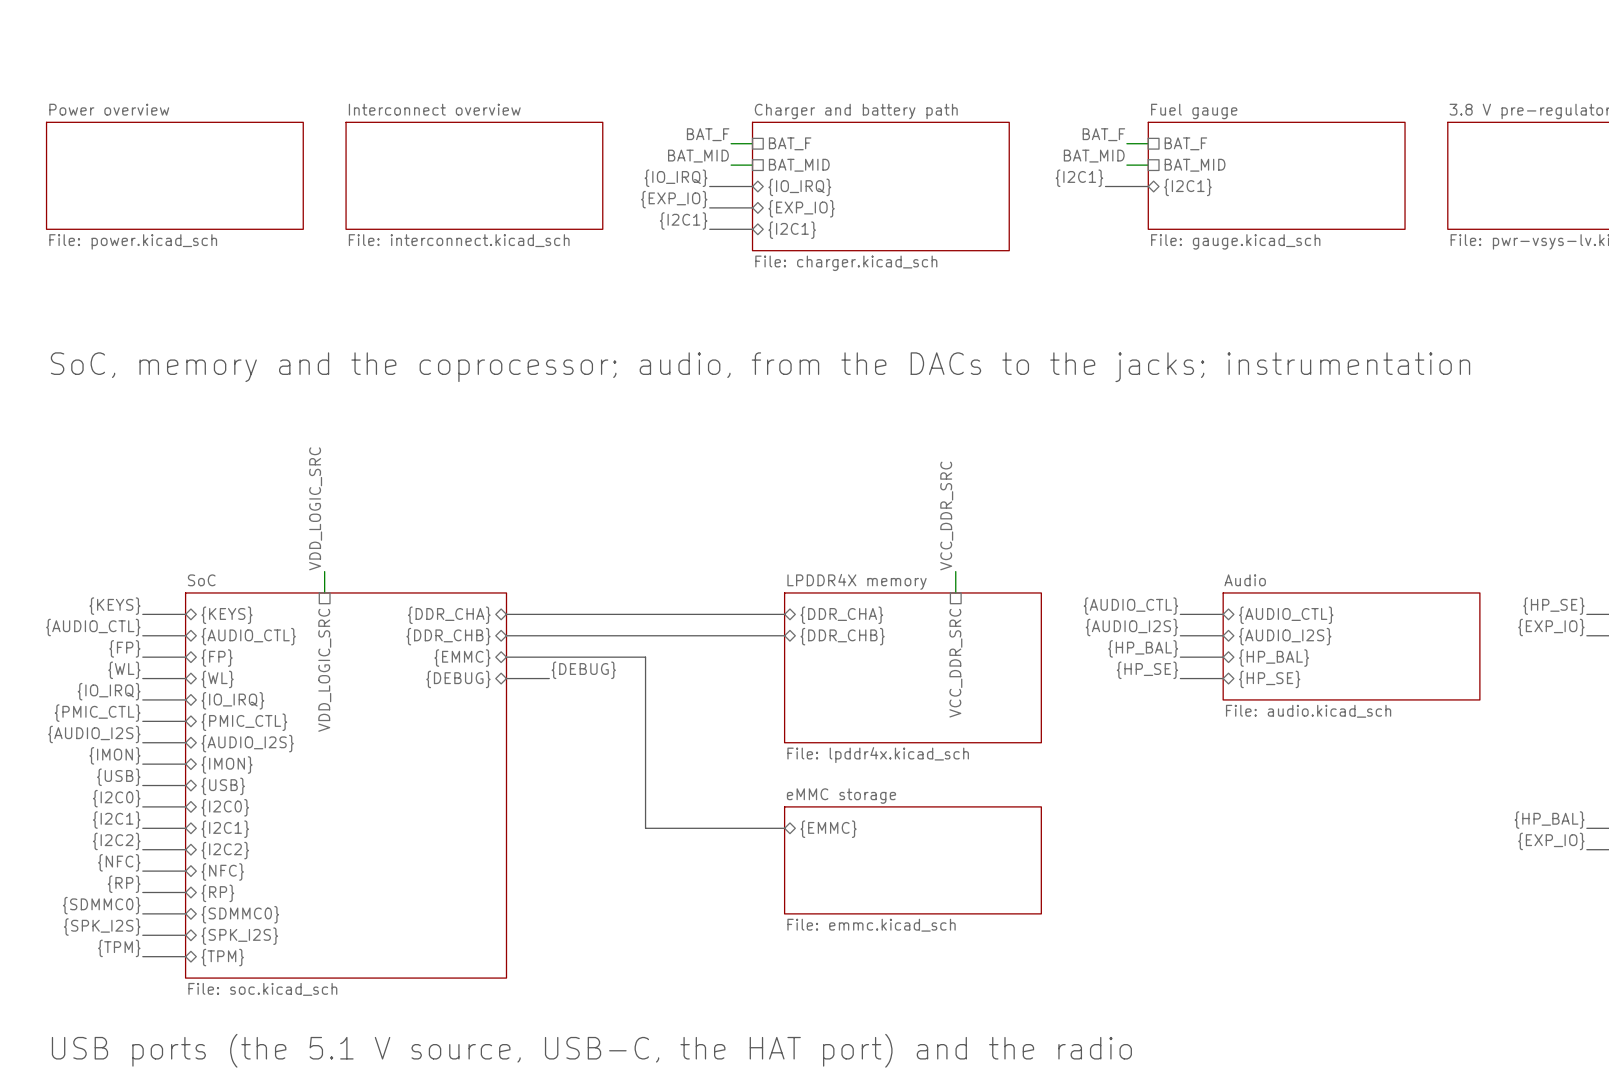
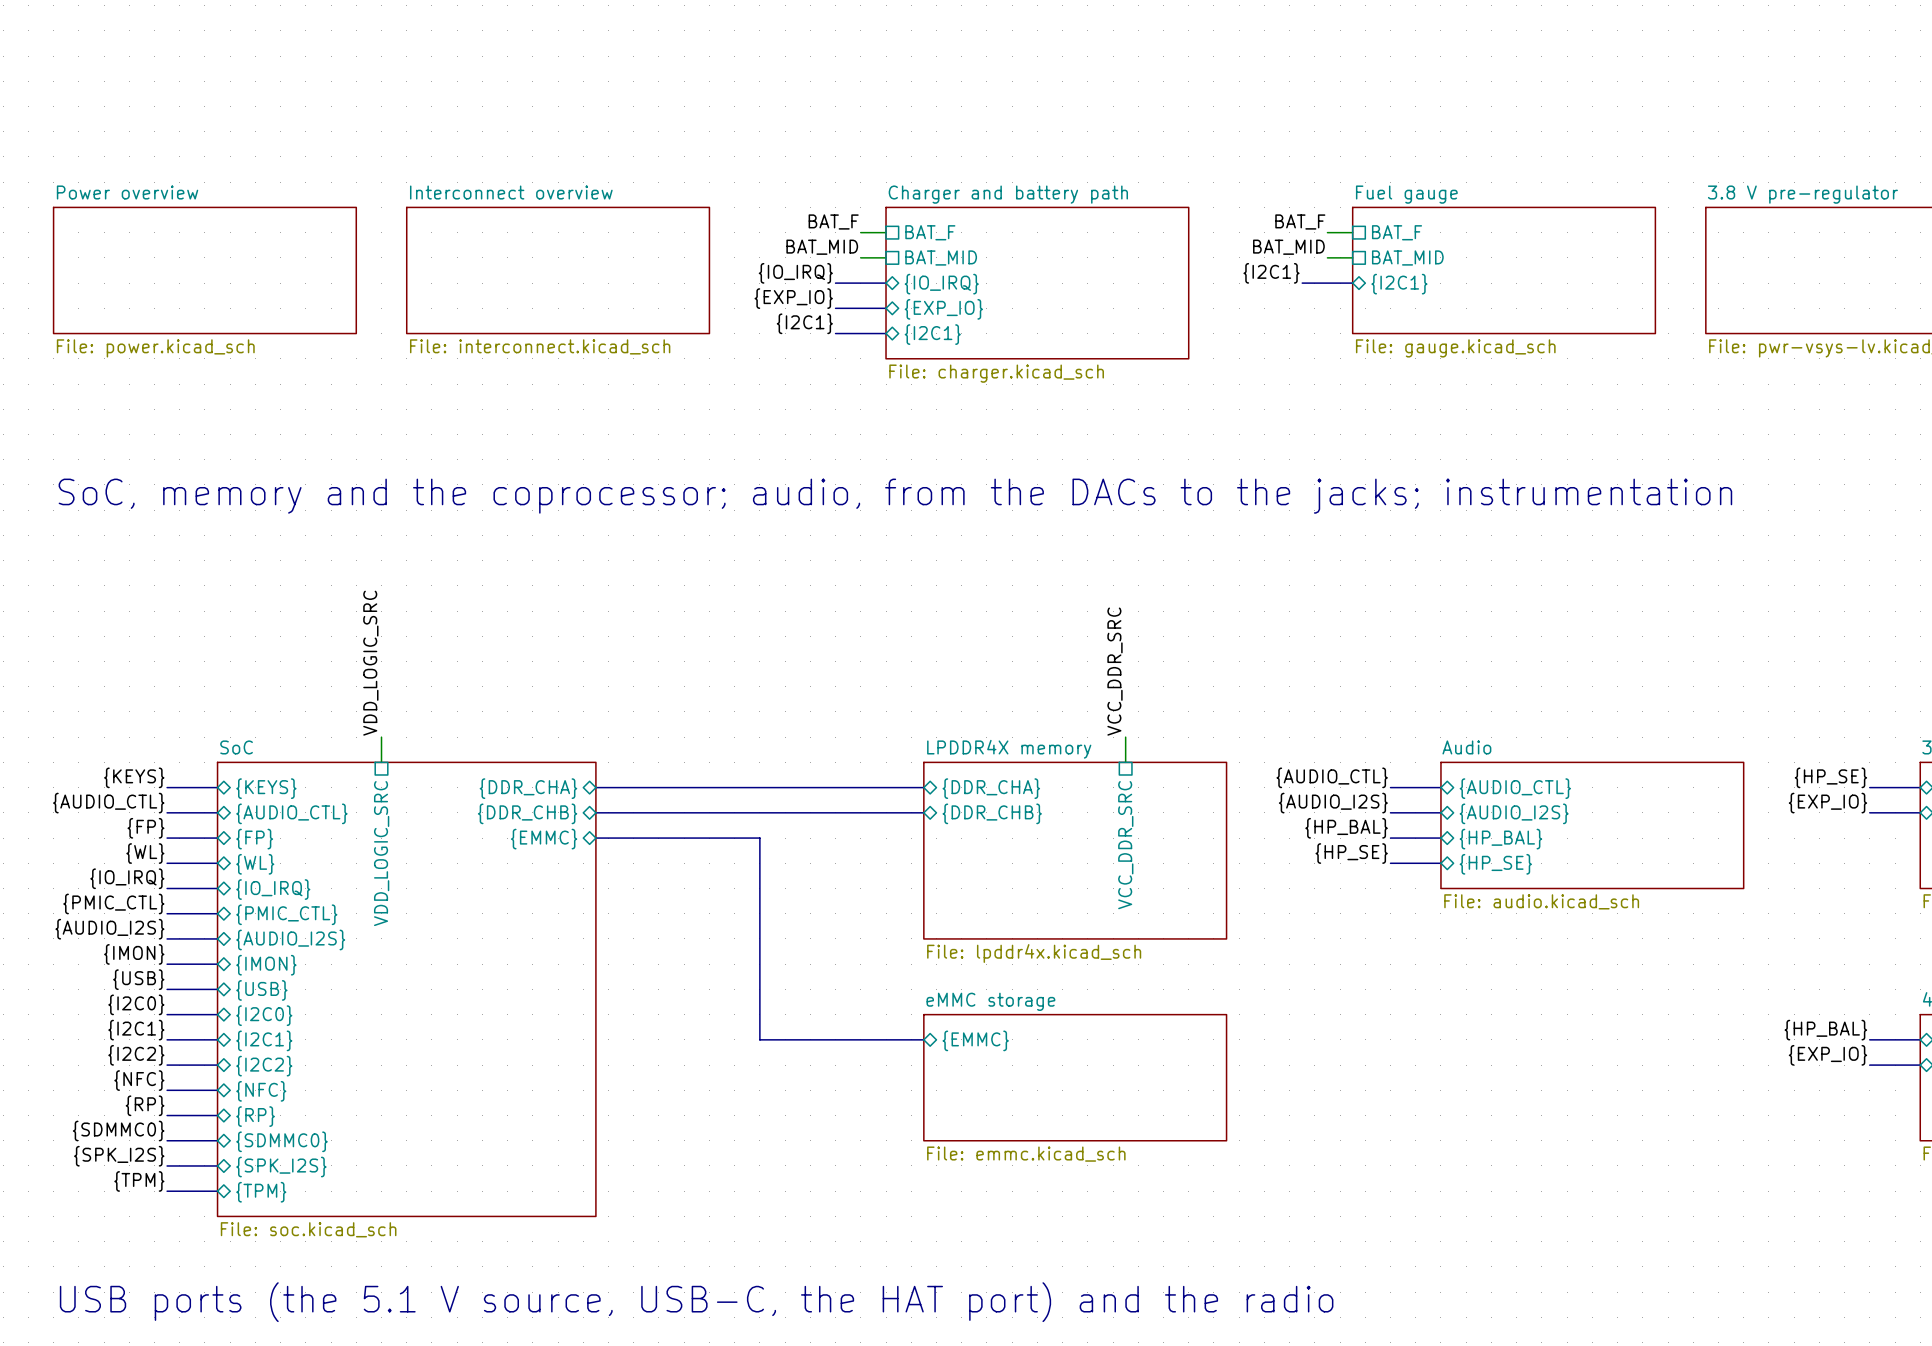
label: {DEBUG} (583, 670) -> none
bus: (506, 678) (549, 678) -> none
sheet pin: {DEBUG} (458, 679) -> none

